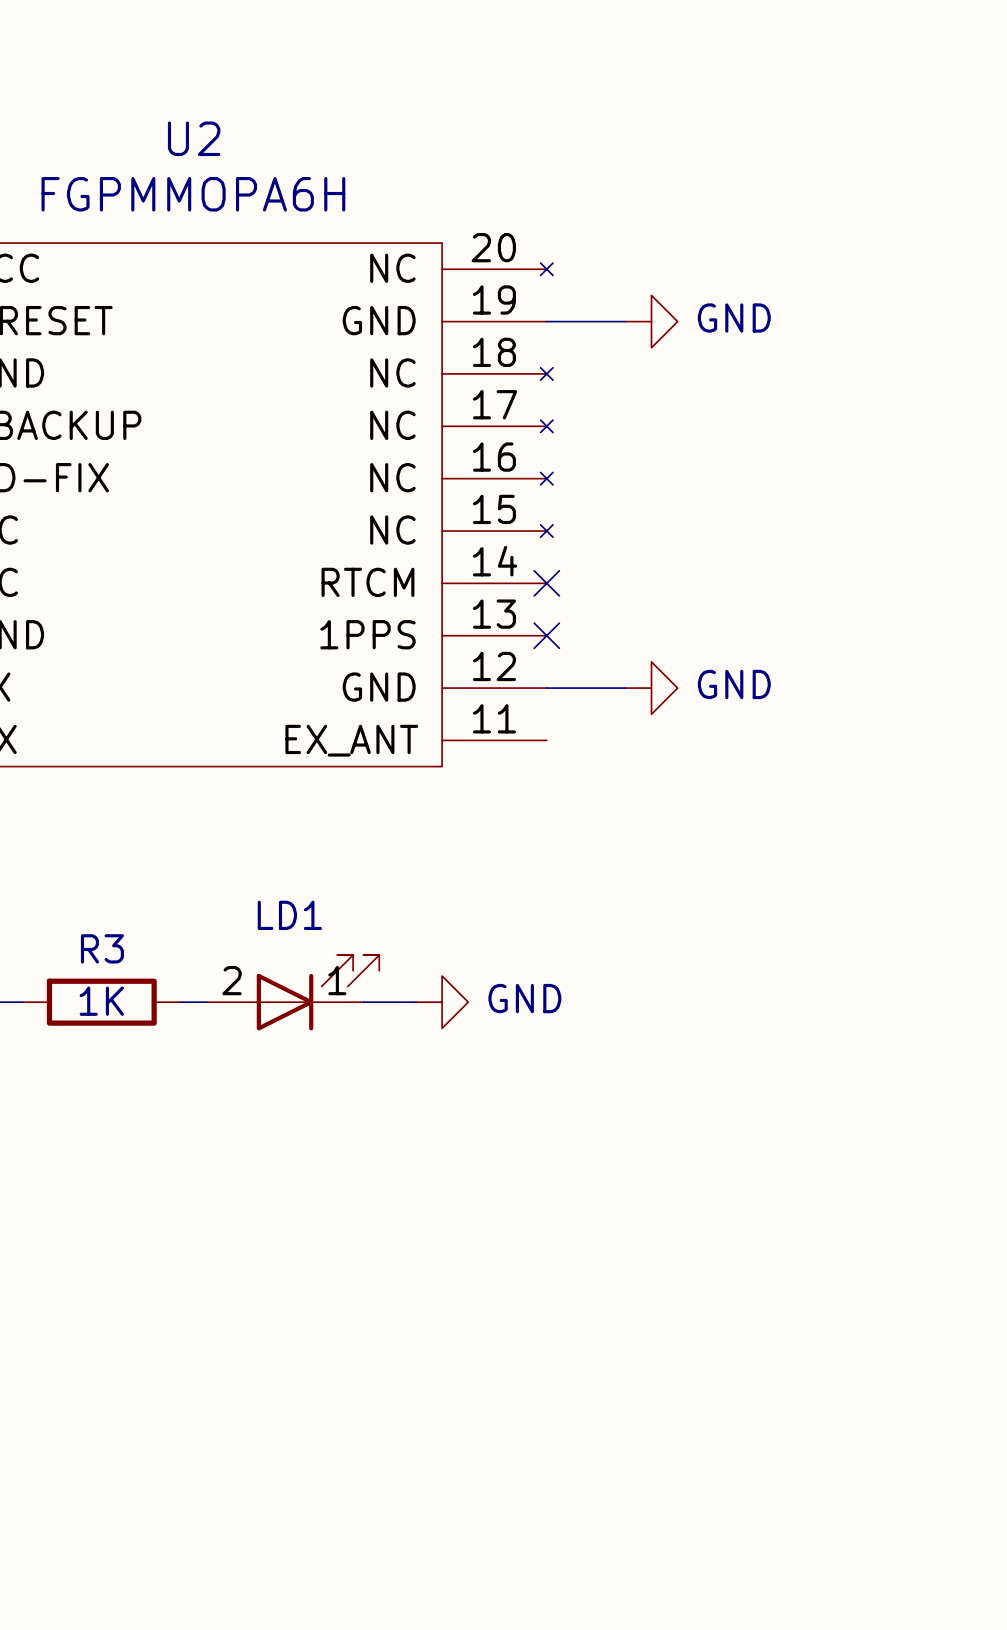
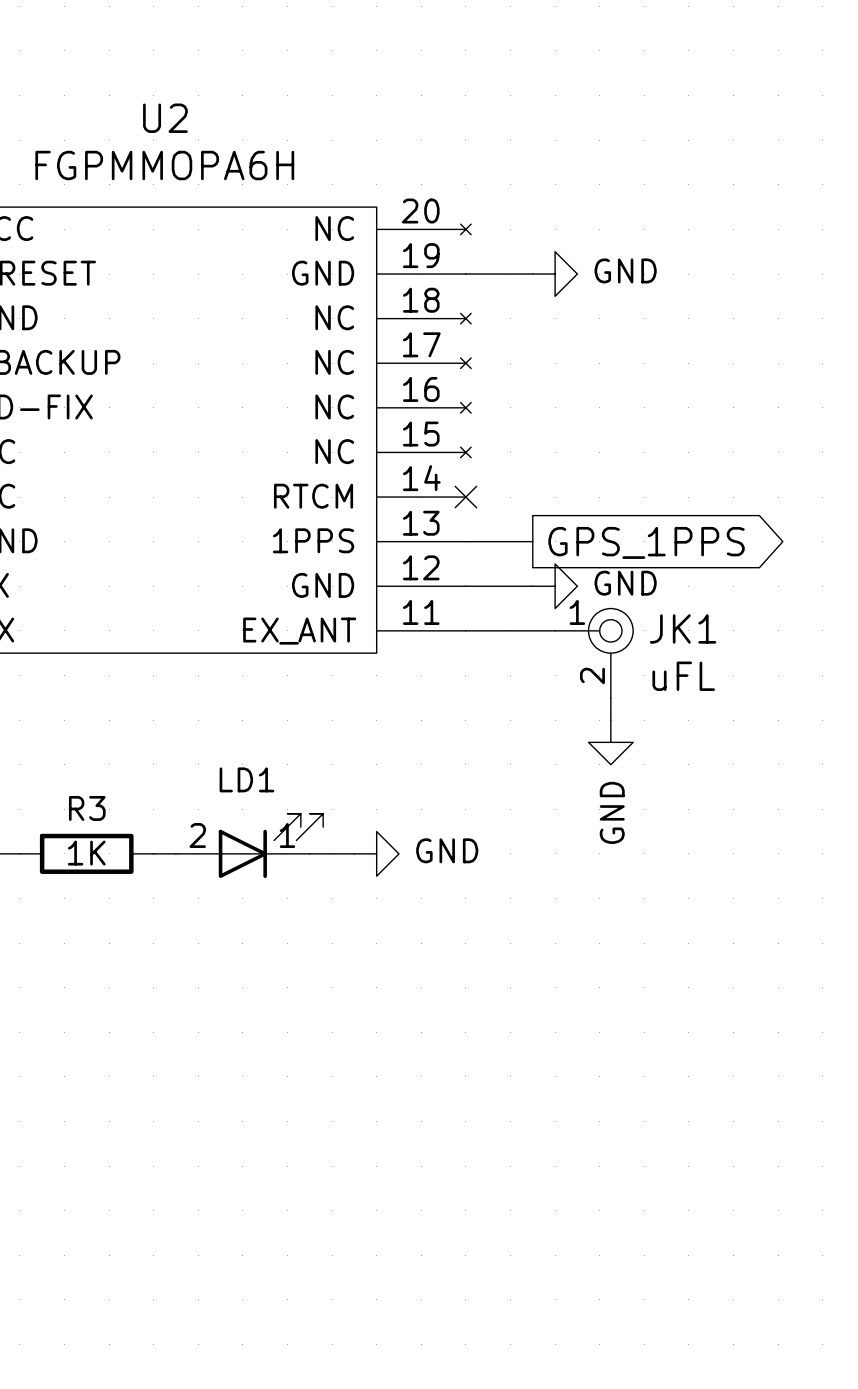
wire: none -> (465, 541) (532, 541)
no-connect mark: (546, 635) -> none
global label: none -> GPS_1PPS (646, 542)
wire: none -> (465, 630) (555, 630)
JK1: none -> uFL (594, 653)
wire: none -> (610, 697) (610, 720)
power symbol: none -> GND (610, 742)

